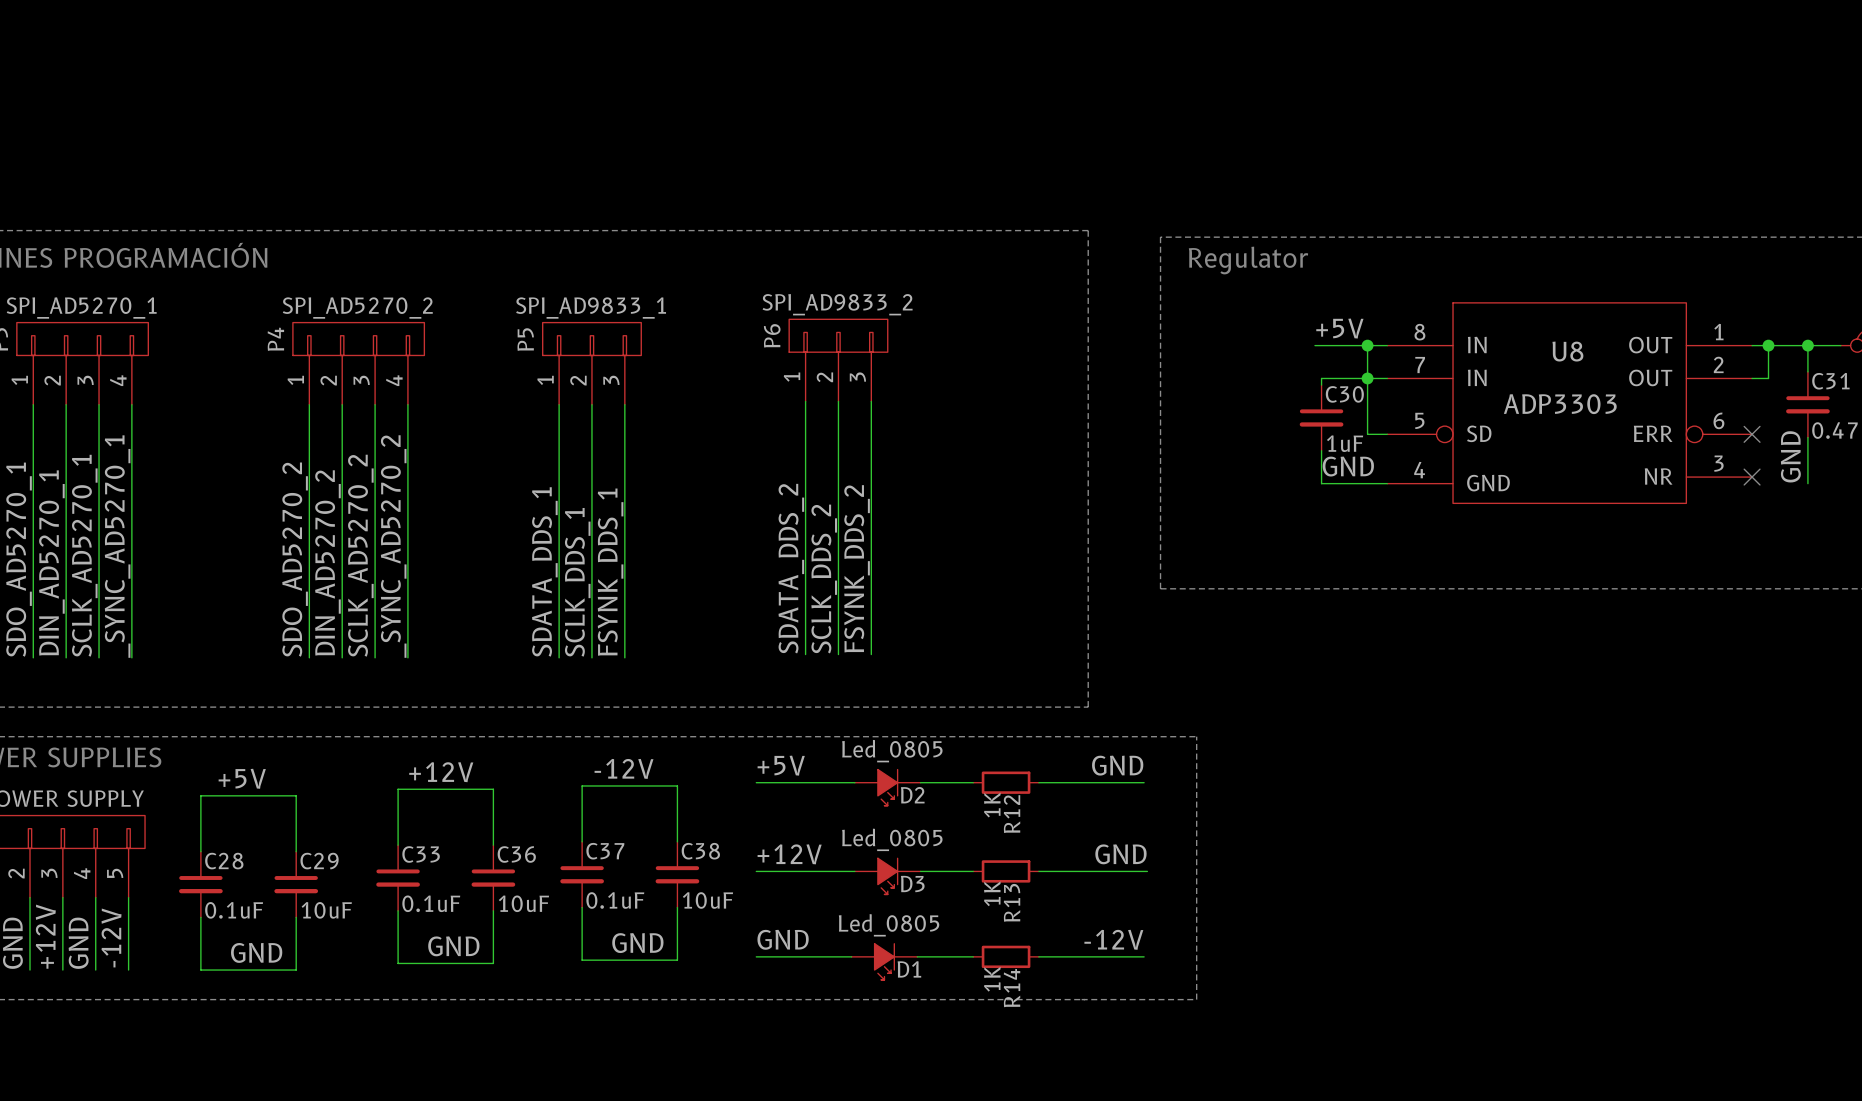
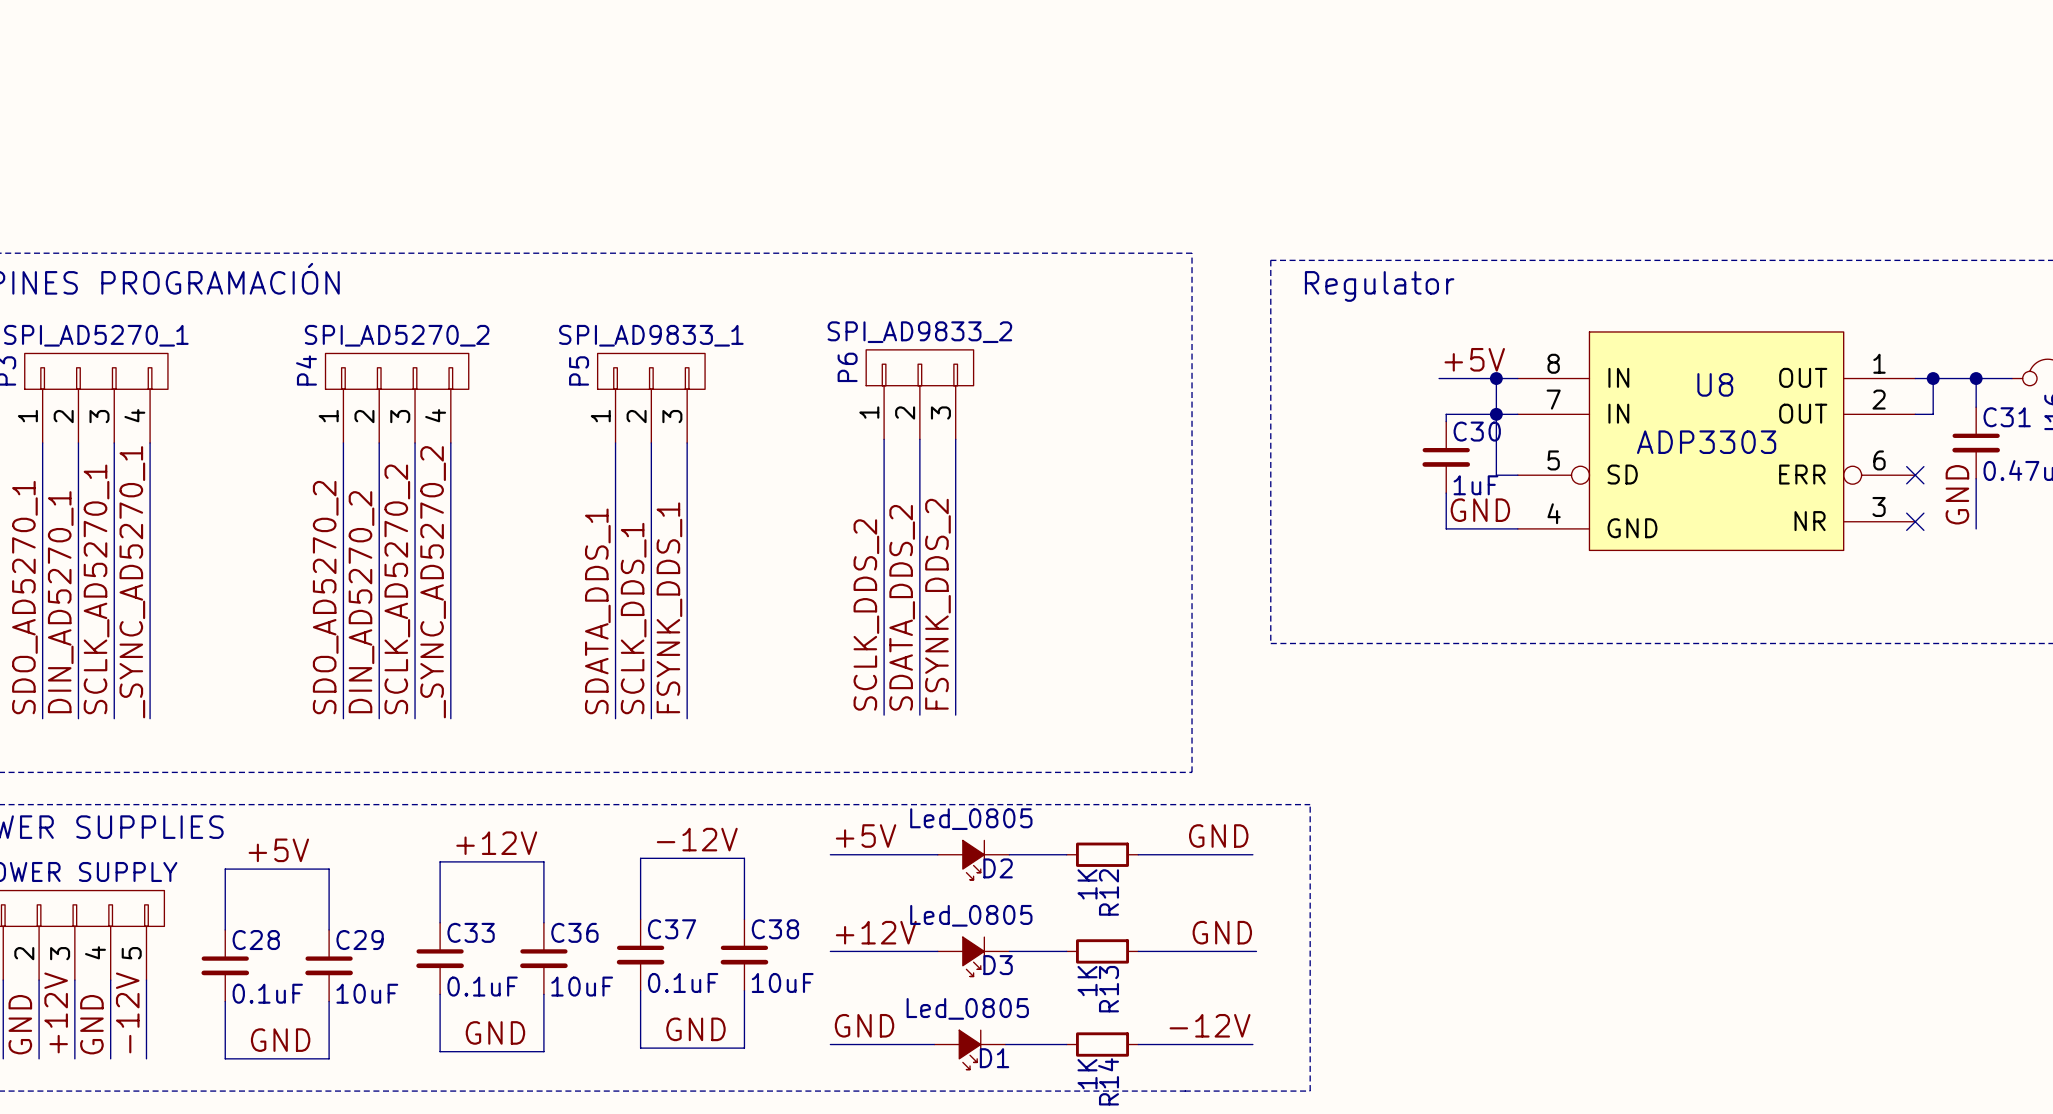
label: SDATA_DDS_2 (791, 568) -> SCLK_DDS_2 (866, 614)
label: SCLK_DDS_2 (824, 579) -> SDATA_DDS_2 (902, 607)

